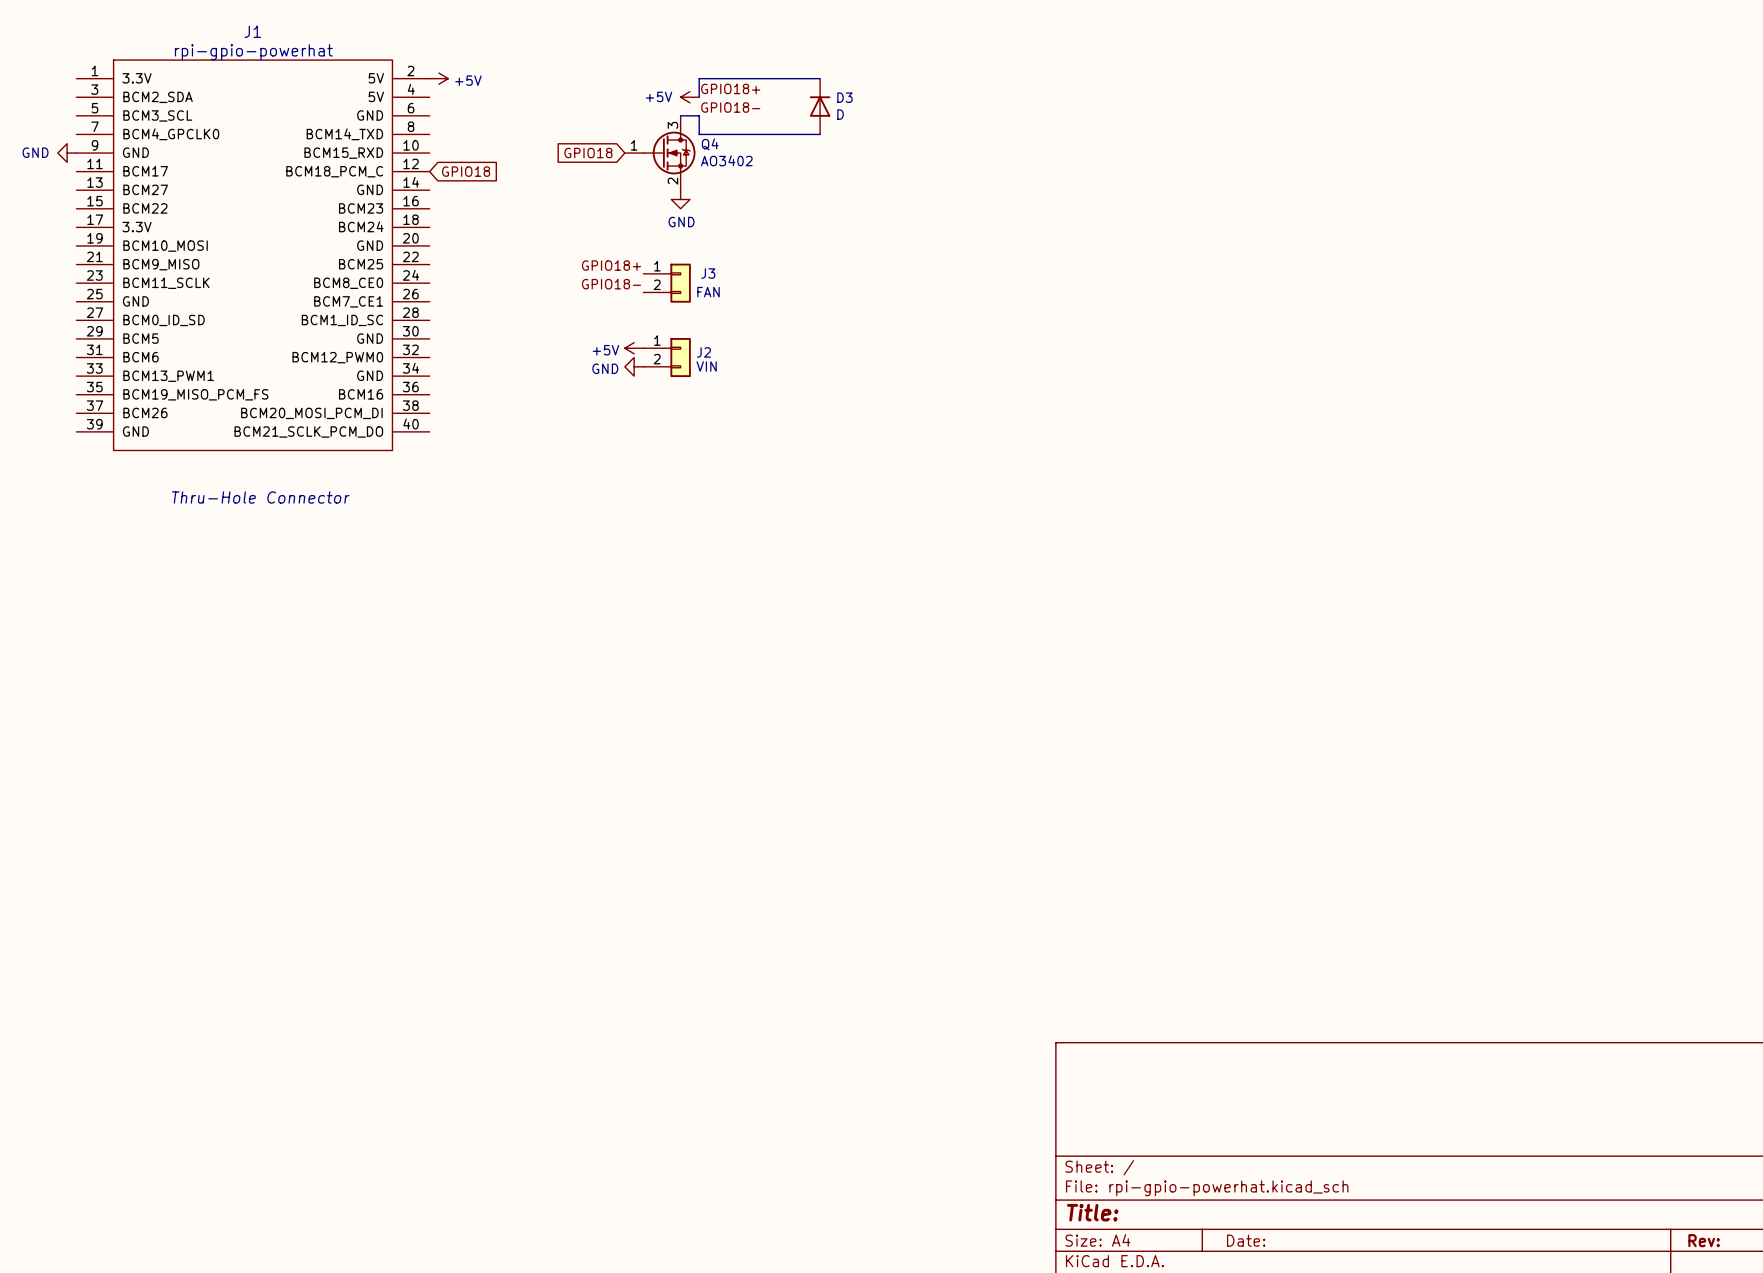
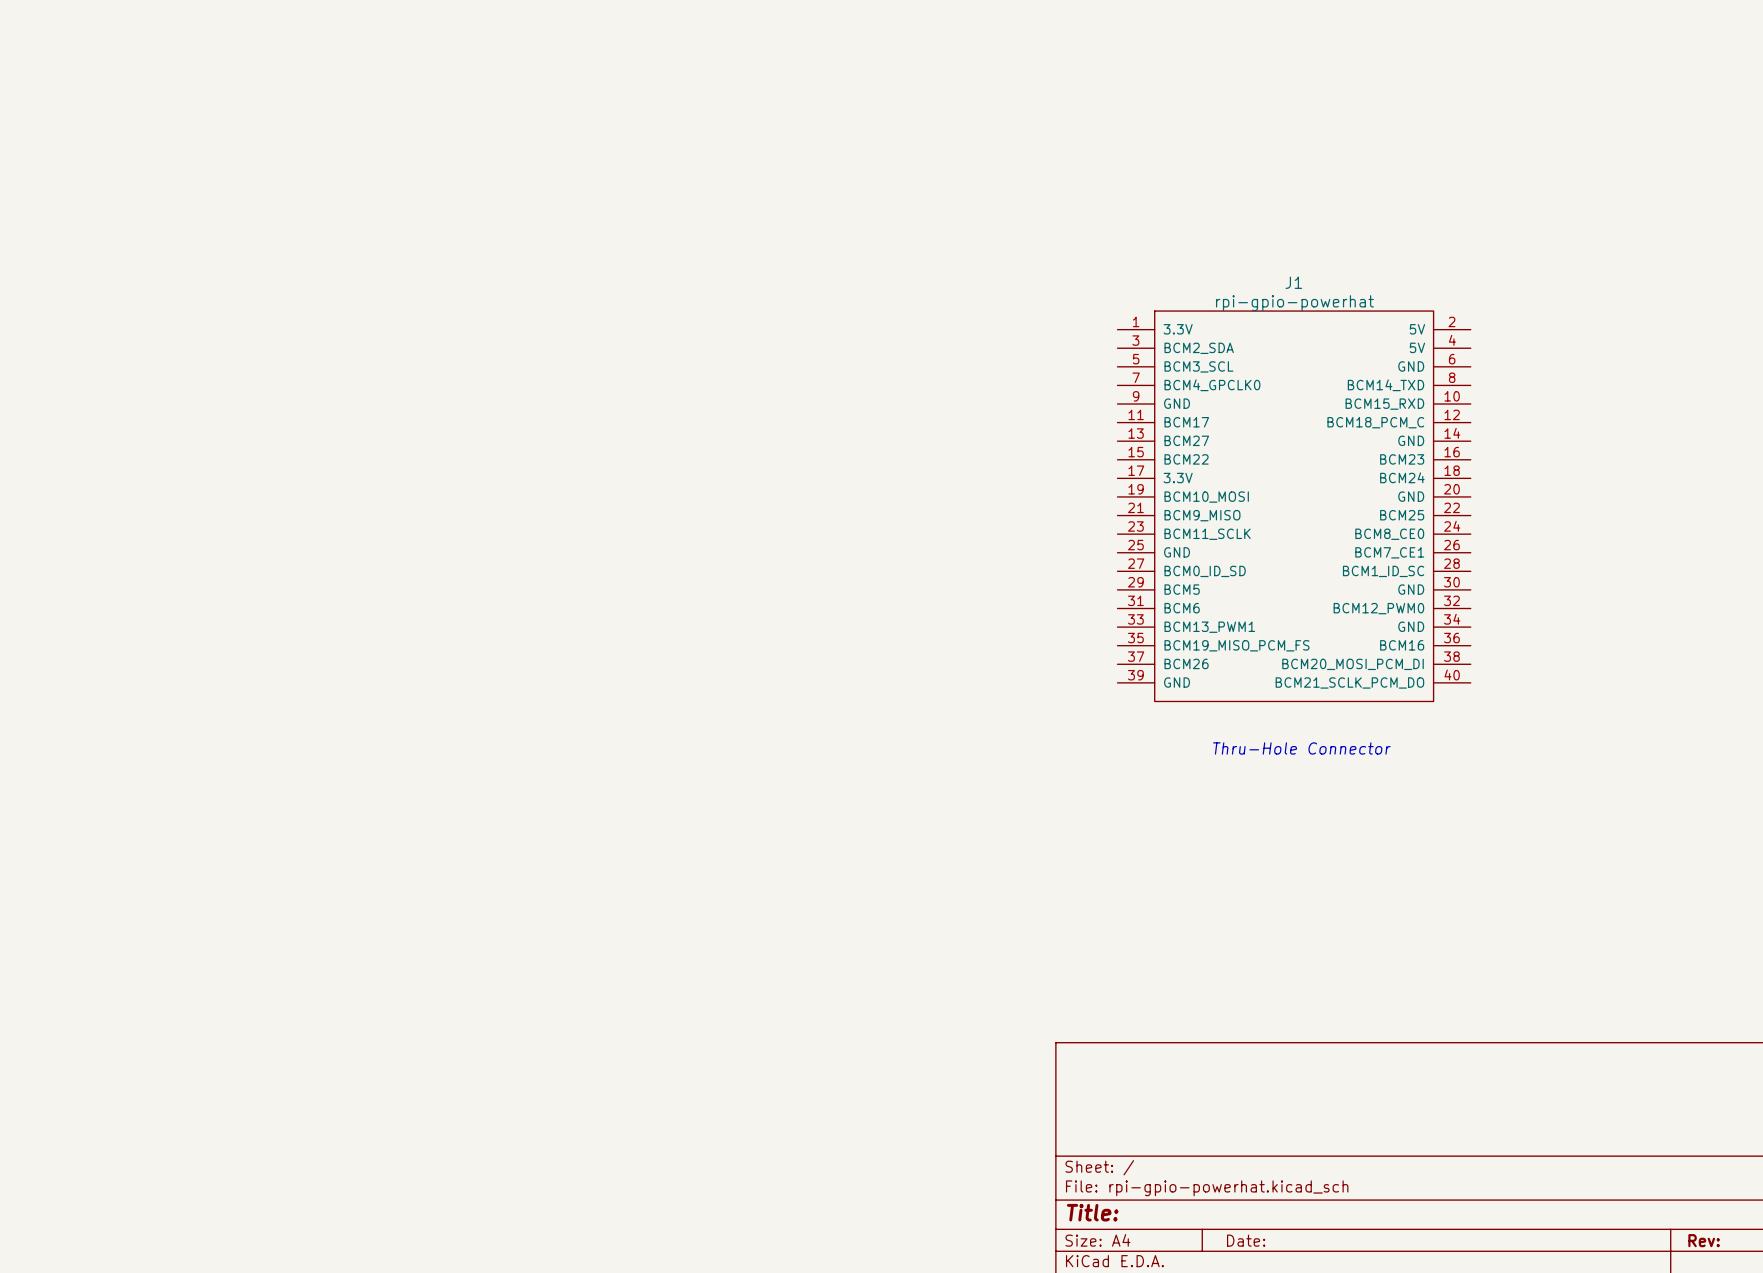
power symbol: +5V (438, 78) -> none
wire: (820, 78) (699, 78) (699, 97) -> none
label: GPIO18+ (730, 88) -> none
power symbol: +5V (689, 97) -> none
D3: D (820, 106) -> none
label: GPIO18- (730, 107) -> none
wire: (680, 115) (699, 115) (699, 134) (820, 134) -> none
power symbol: GND (67, 153) -> none
global label: GPIO18 (588, 153) -> none
Q4: AO3402 (660, 153) -> none
global label: GPIO18 (466, 171) -> none
power symbol: GND (680, 199) -> none
J1 position: (253, 255) -> (1294, 506)
label: GPIO18+ (611, 265) -> none
J3: FAN (667, 283) -> none
label: GPIO18- (611, 284) -> none
power symbol: +5V (634, 348) -> none
J2: VIN (667, 357) -> none
power symbol: GND (634, 366) -> none
text: Thru-Hole Connector (260, 497) -> none
text: none -> Thru-Hole Connector (1301, 748)

